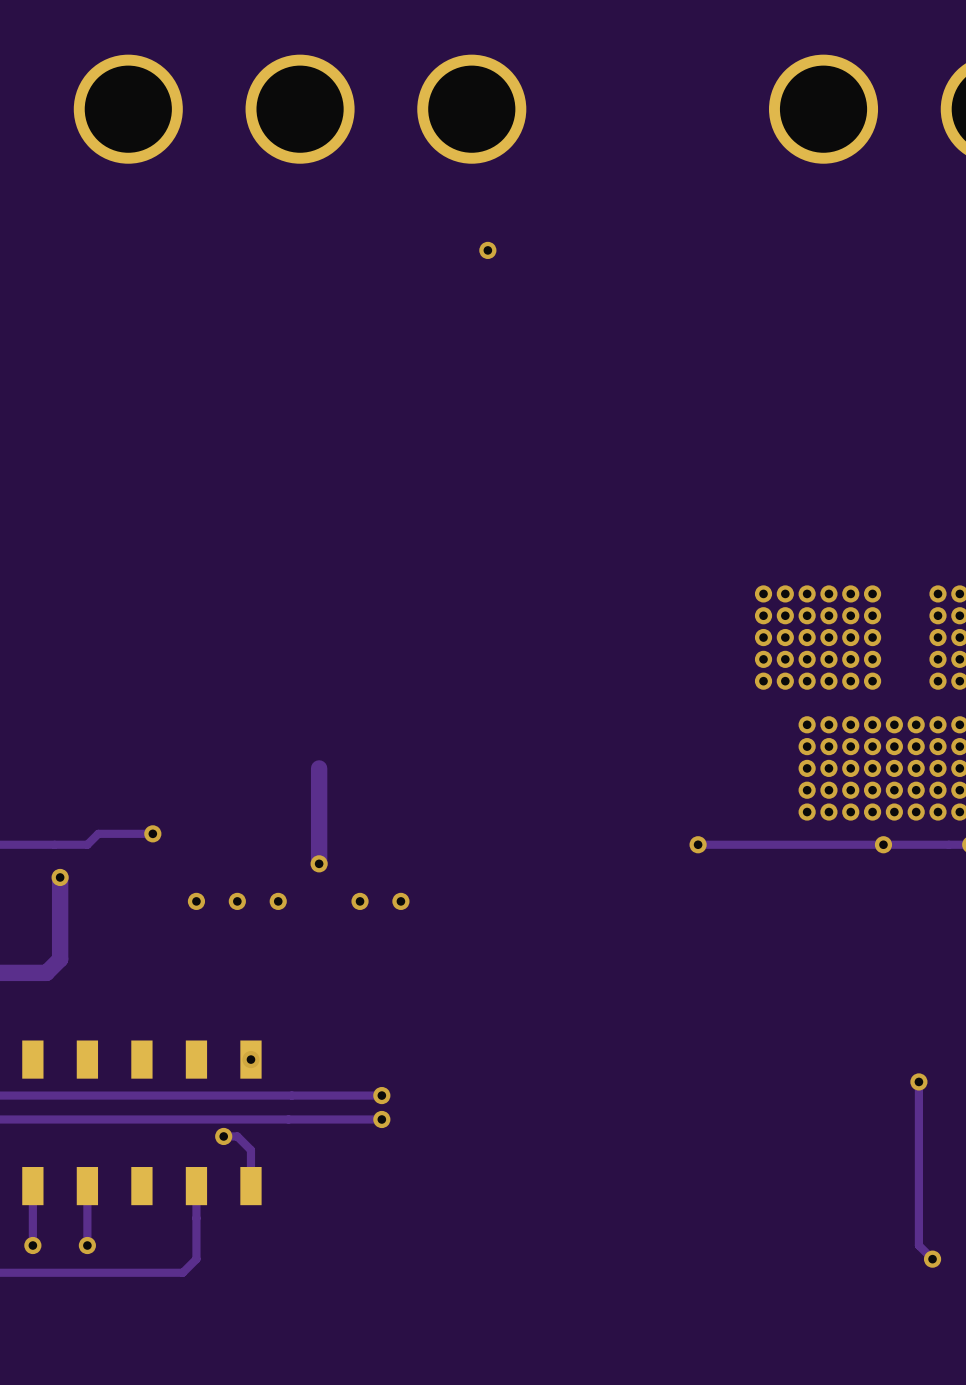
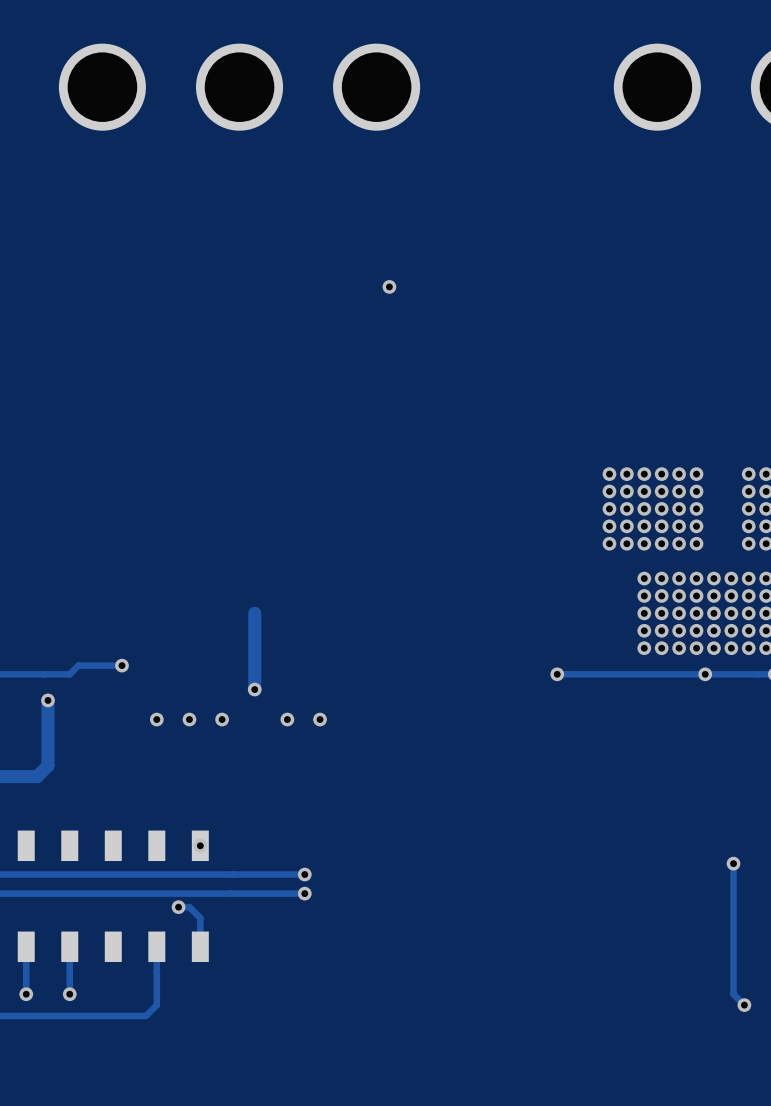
via position: (487, 250) -> (389, 286)

